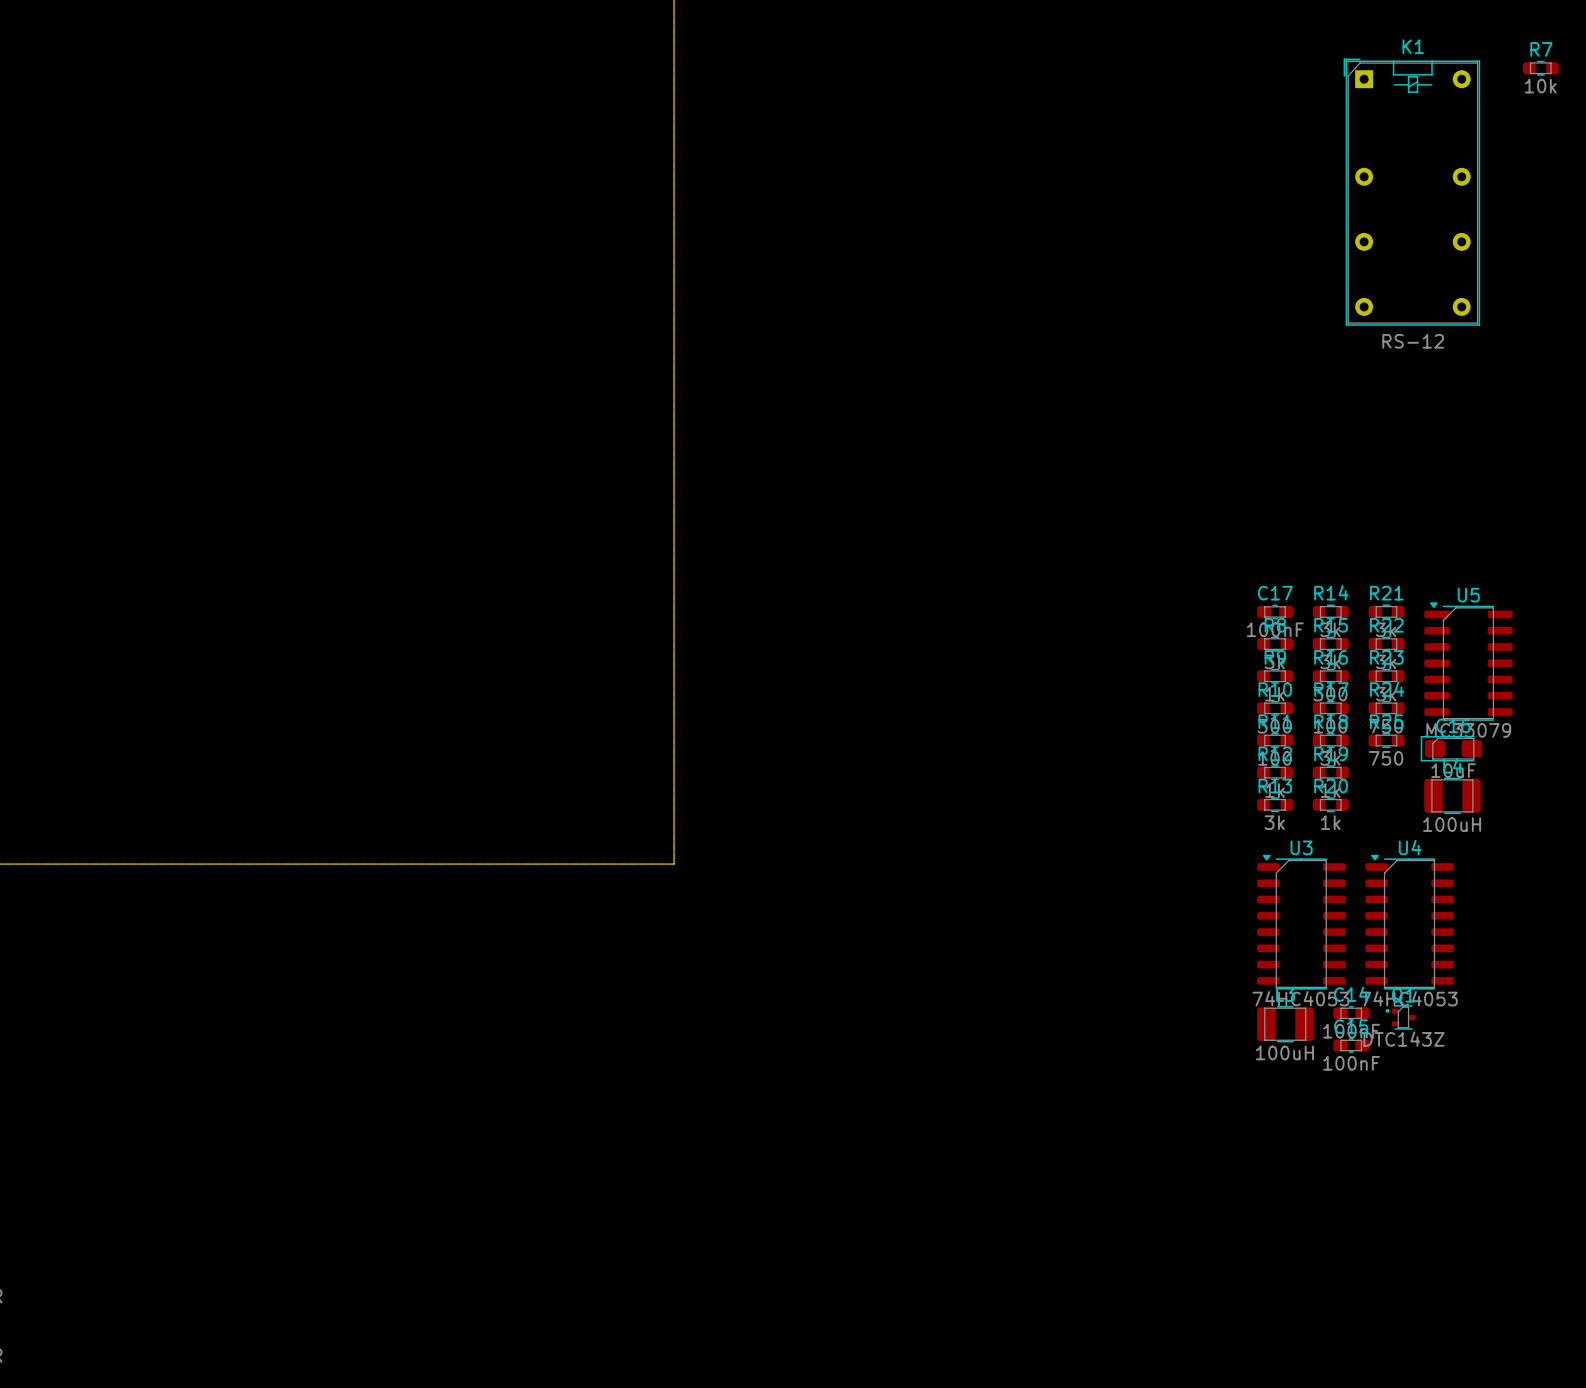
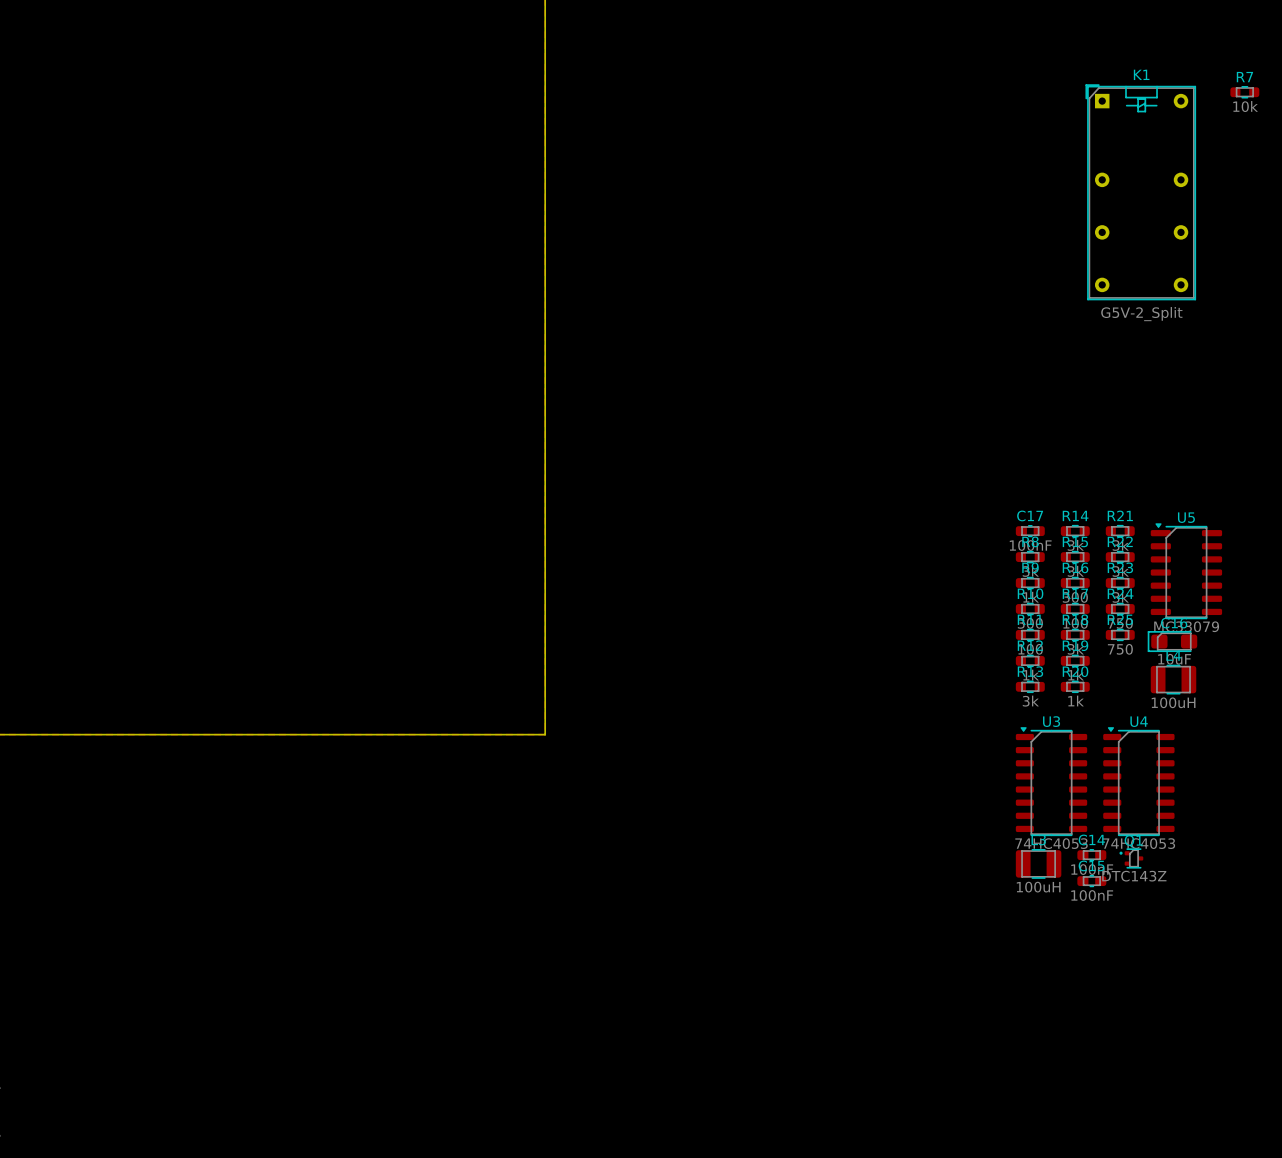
K1 value: RS-12 (1413, 341) -> G5V-2_Split (1141, 314)

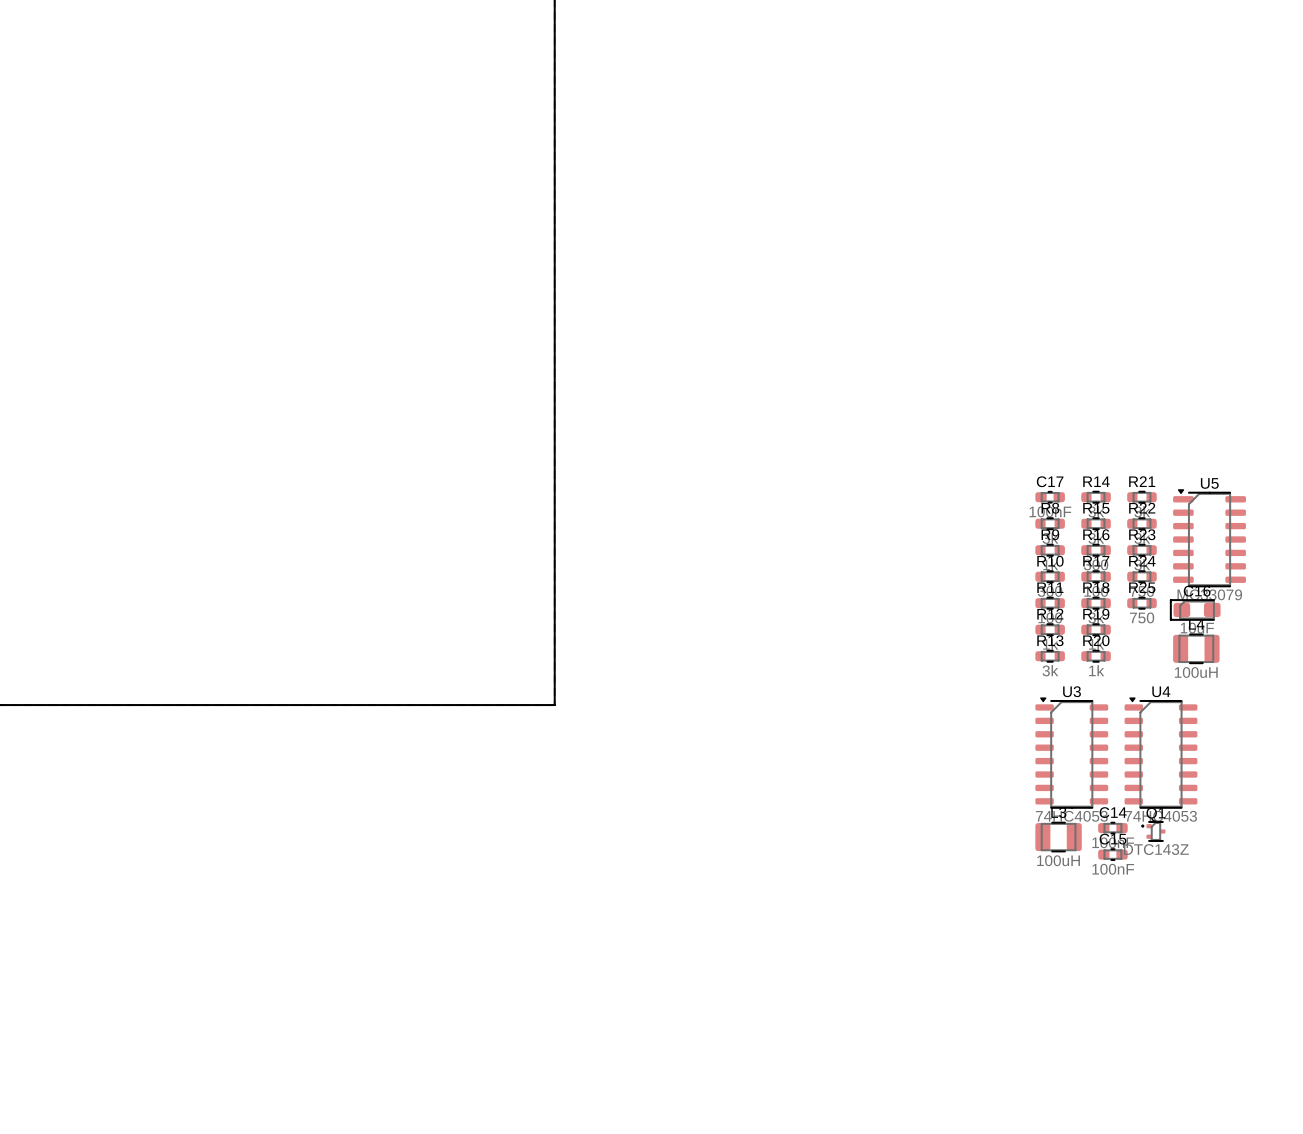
R7: 10k (1244, 92) -> none
K1: G5V-2_Split (1140, 192) -> none

